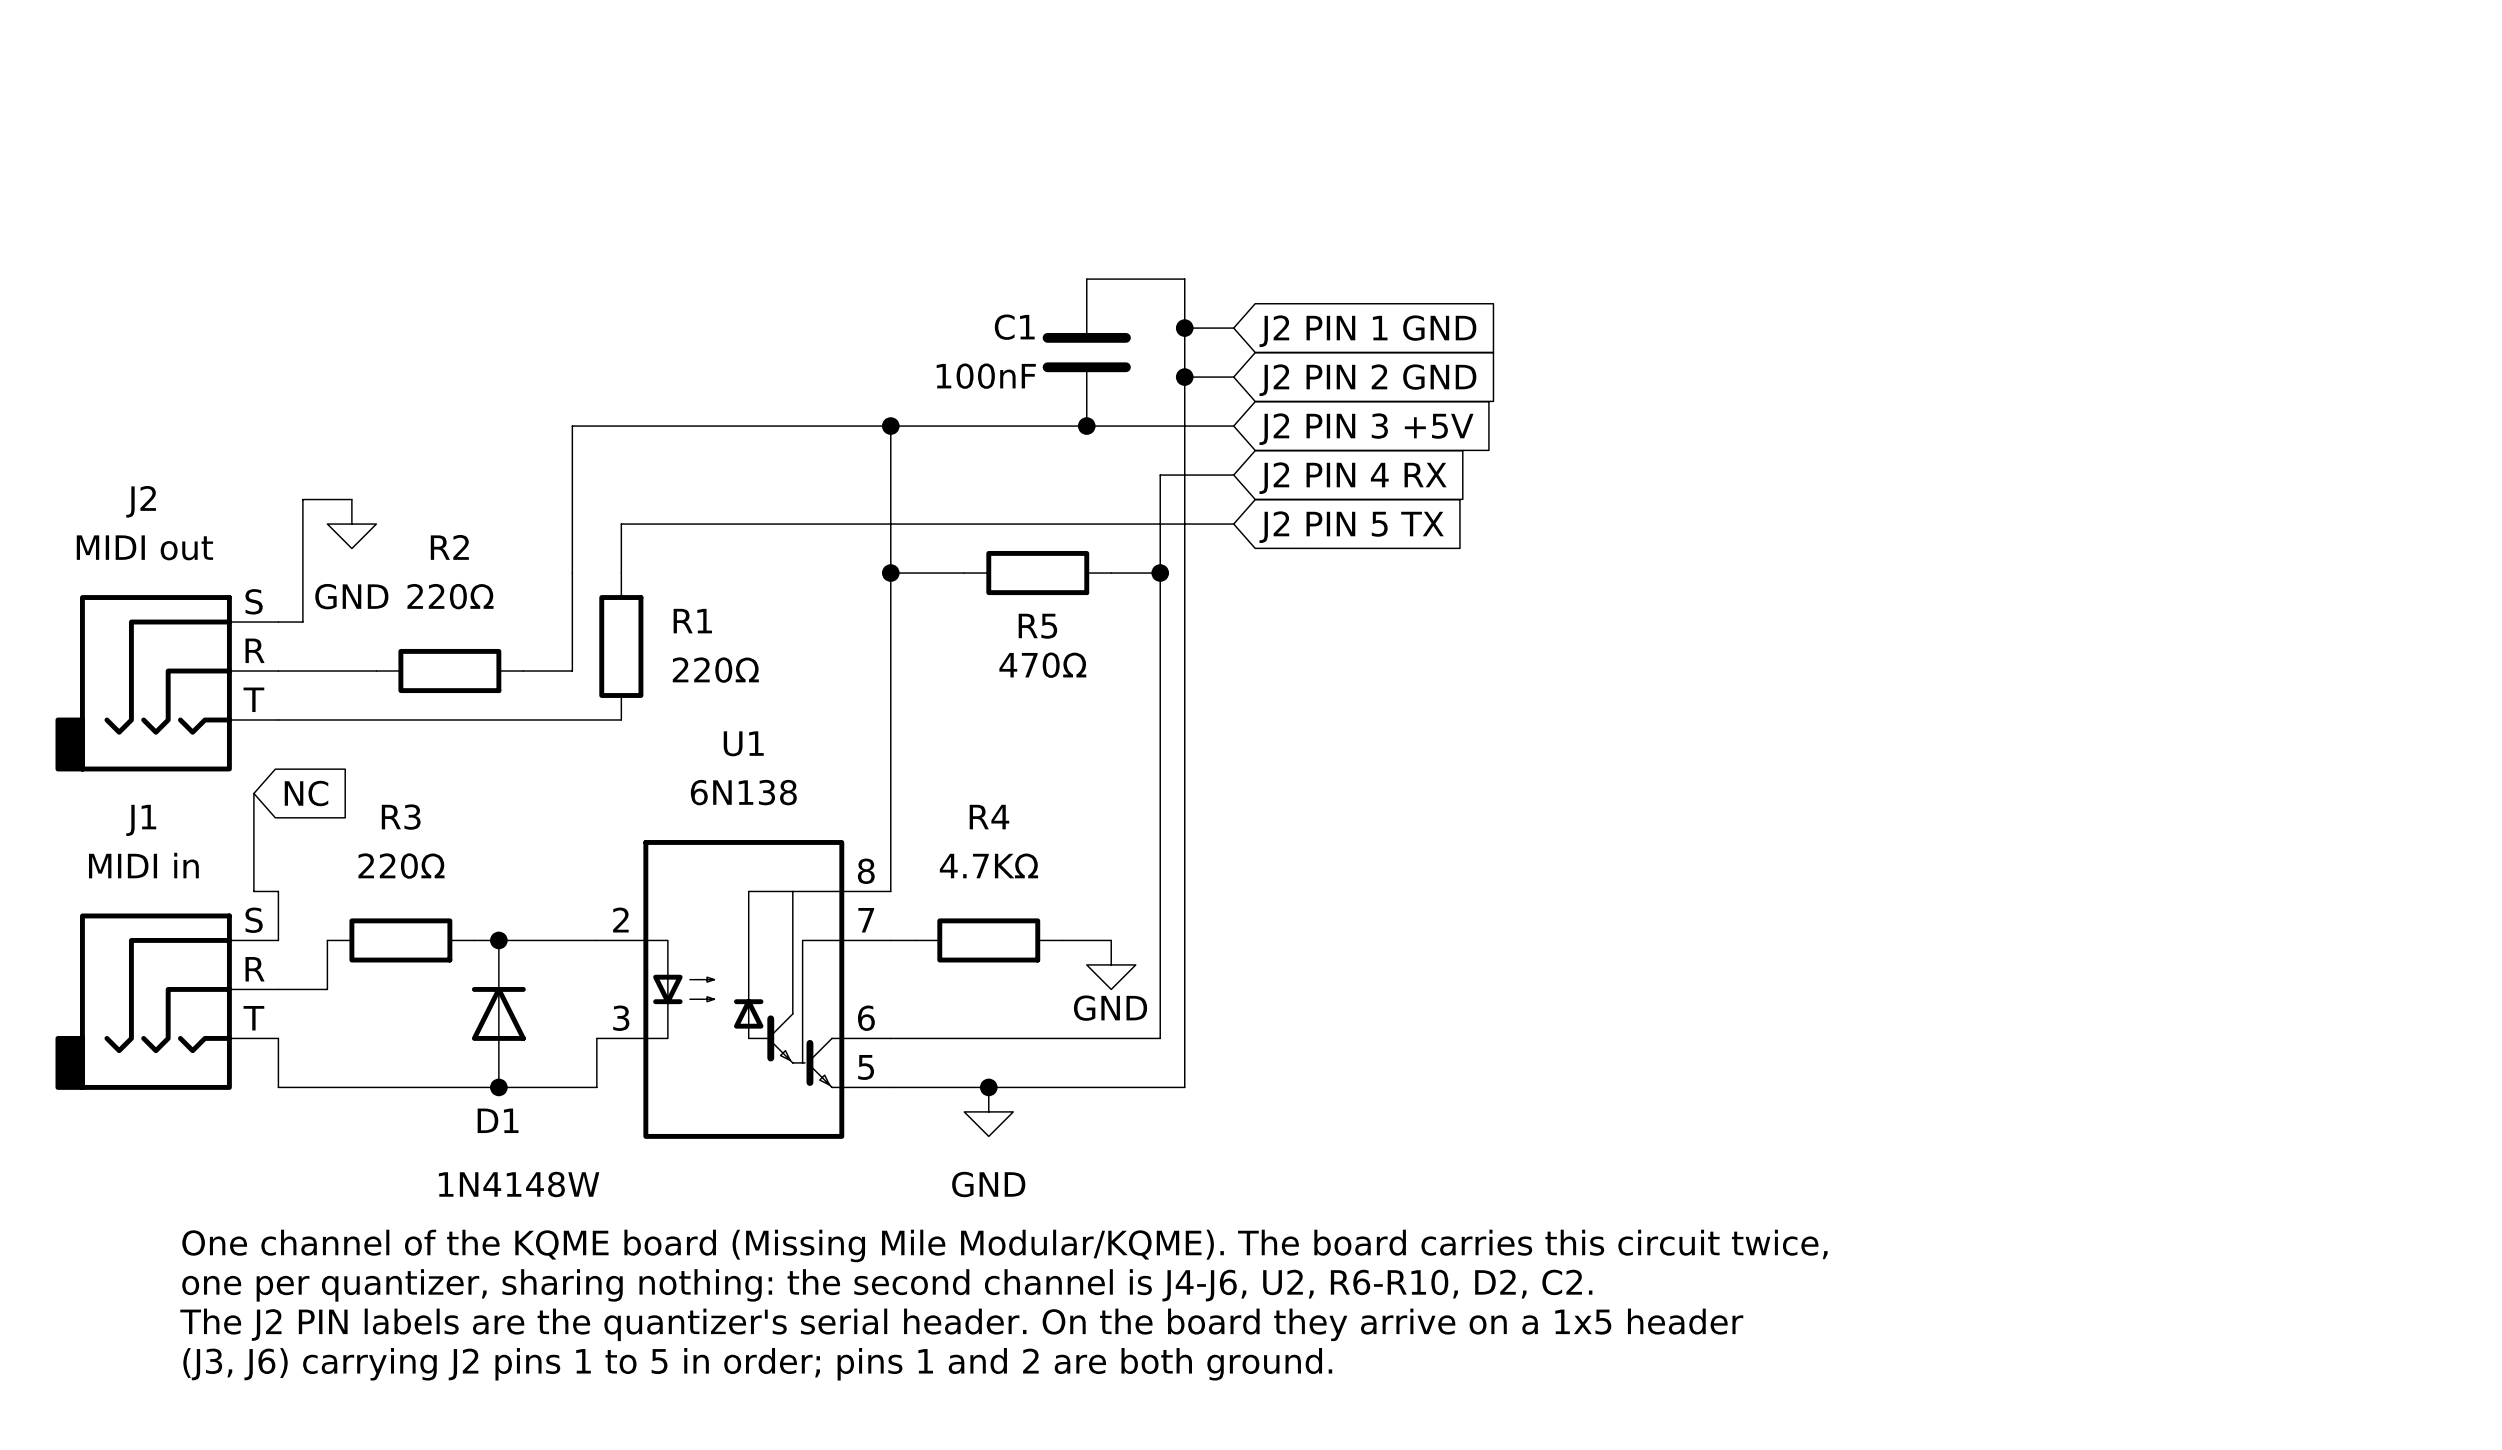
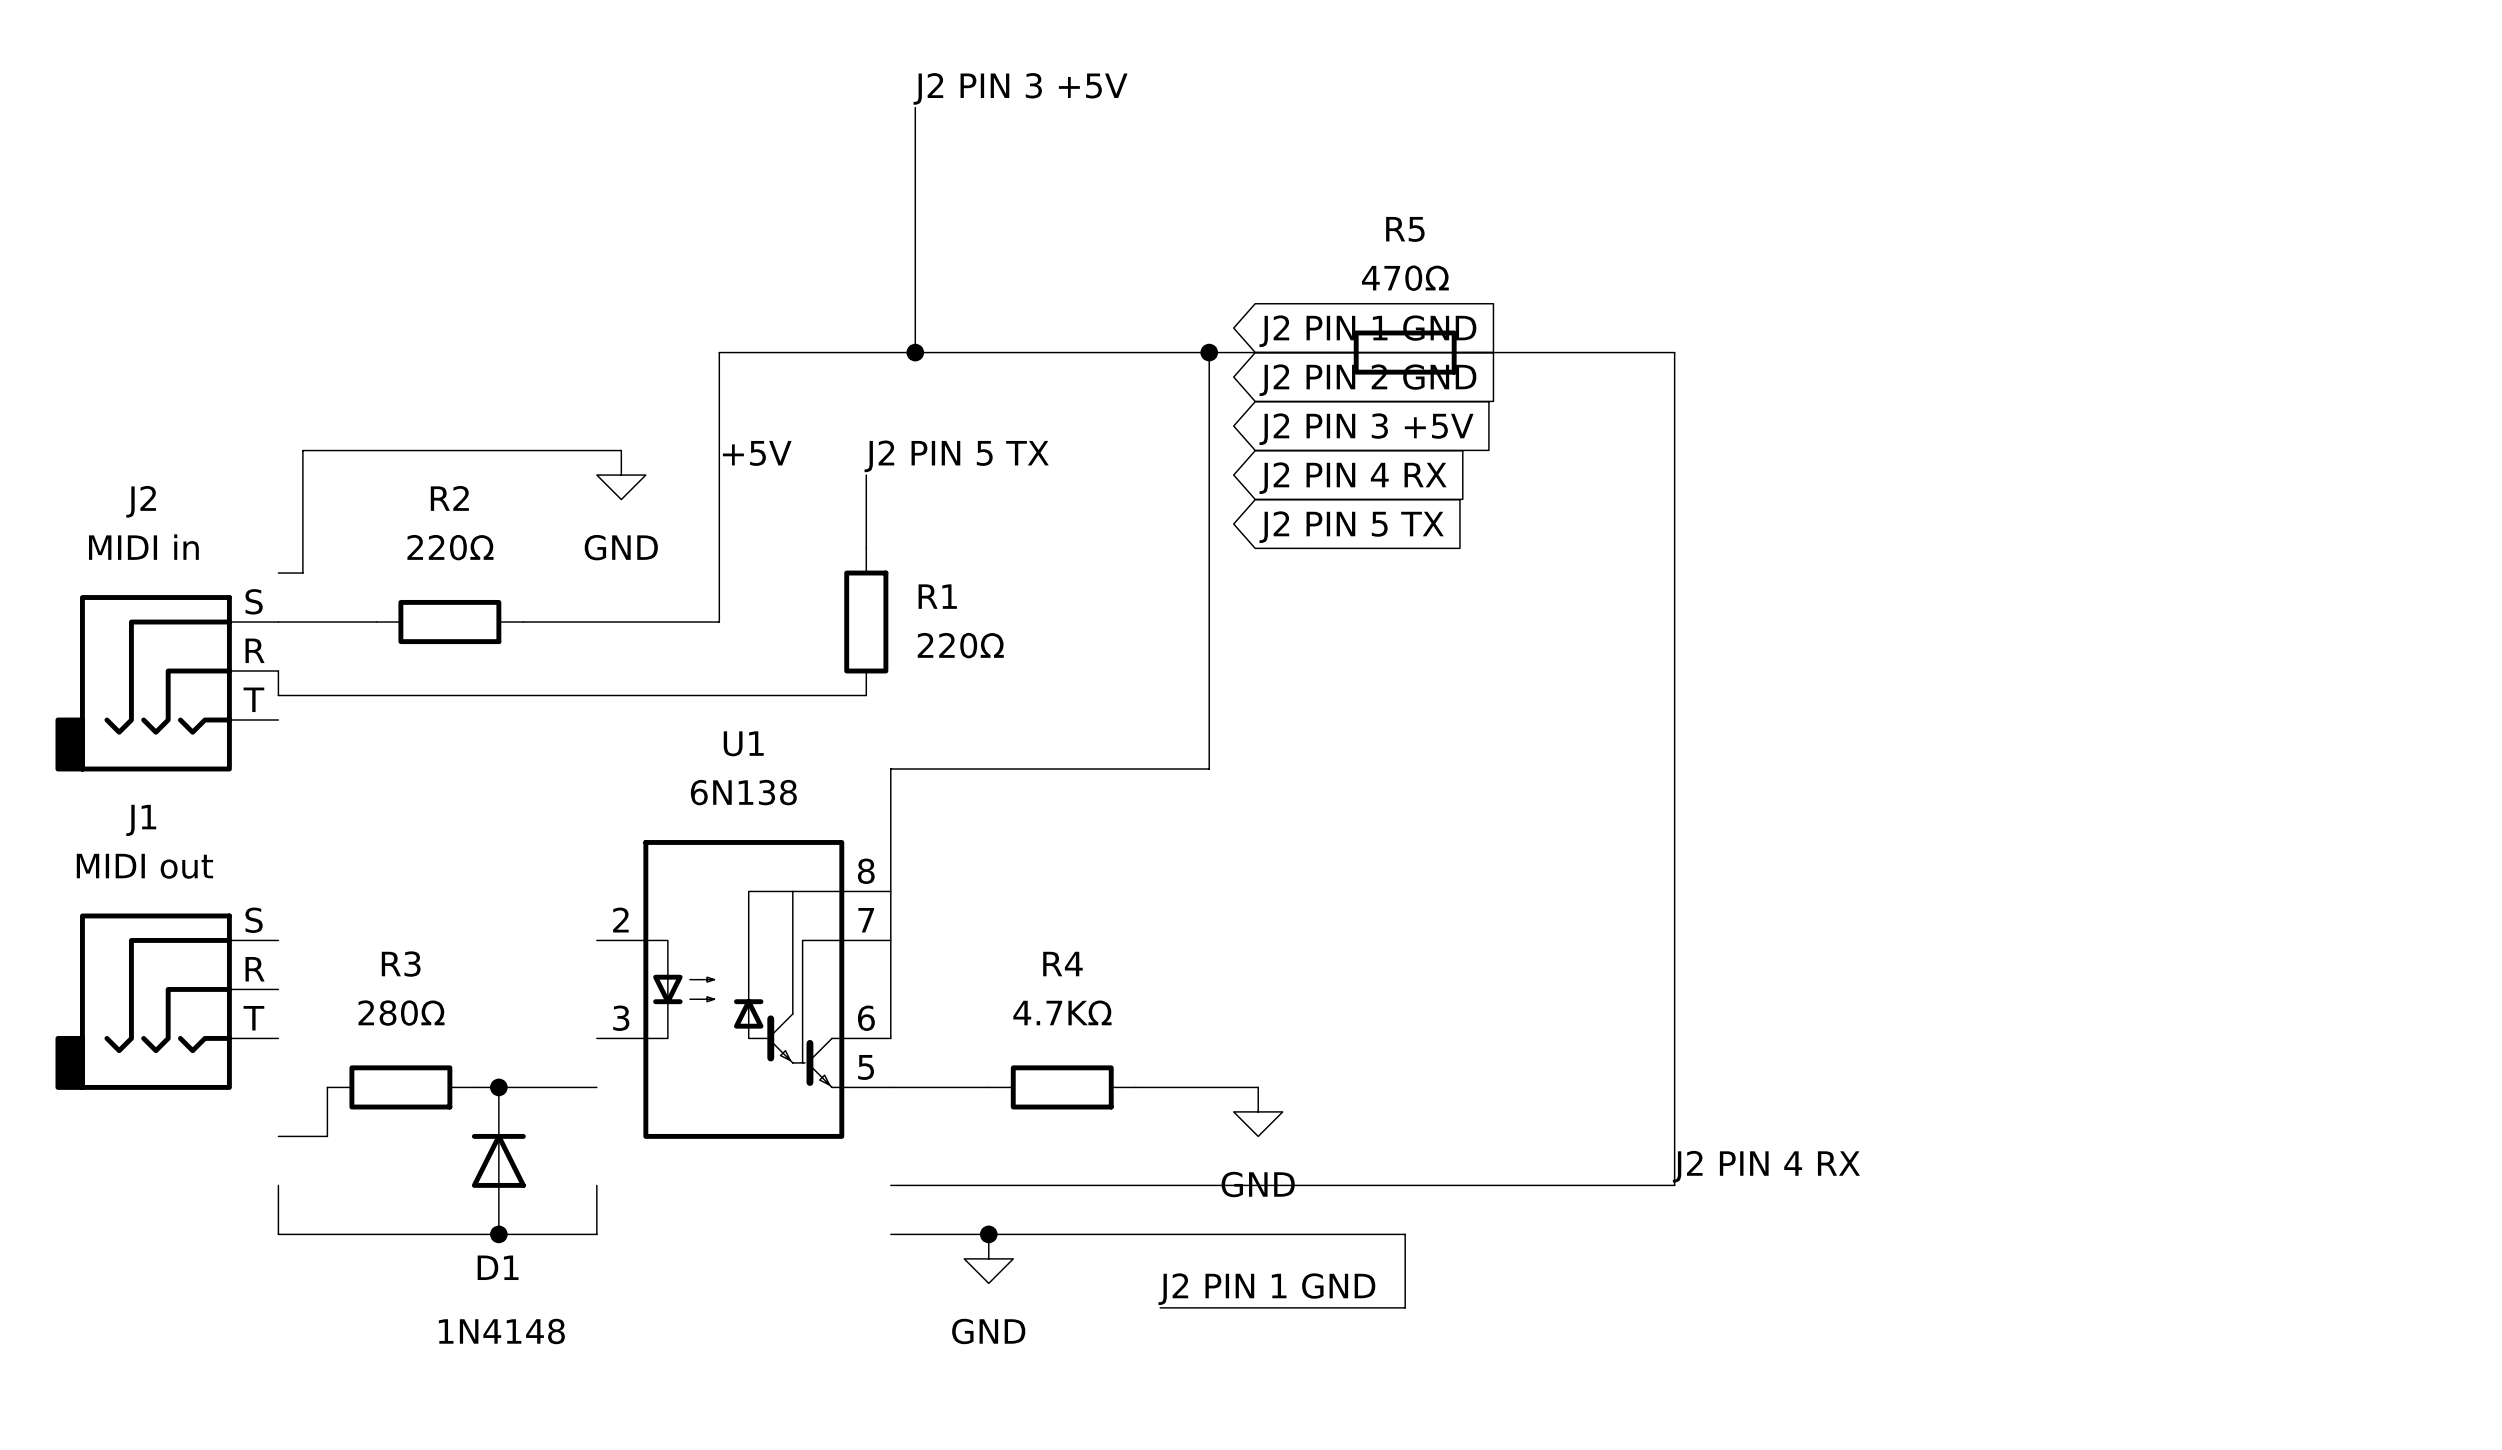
label: none -> J2 PIN 3 +5V (1020, 88)
wire: none -> (915, 107) (915, 352)
wire: (1086, 279) (1184, 279) (1184, 1087) -> (1258, 1087) (1184, 1087)
wire: (1184, 328) (1233, 328) -> none
junction: (1184, 328) -> none
C1: 100nF (1086, 352) -> none
junction: none -> (1209, 352)
wire: none -> (1331, 352) (719, 352) (719, 622) (523, 622)
wire: none -> (1478, 352) (1674, 352) (1674, 1185) (890, 1185)
wire: (1184, 377) (1233, 377) -> none
junction: (1184, 377) -> none
wire: (890, 426) (890, 768) -> (1209, 352) (1209, 768) (890, 768)
junction position: (890, 426) -> (915, 352)
junction: (1086, 426) -> none
wire: (1233, 426) (572, 426) (572, 671) (523, 671) -> none
label: none -> +5V (757, 453)
label: none -> J2 PIN 5 TX (956, 456)
wire: none -> (866, 475) (866, 548)
wire: (1233, 475) (1160, 475) (1160, 1038) (890, 1038) -> (890, 891) (890, 1038)
wire: (302, 499) (351, 499) -> (302, 499) (302, 450) (621, 450)
power symbol position: GND (351, 524) -> GND (621, 475)
wire: (1233, 524) (621, 524) (621, 573) -> none
J2 value: MIDI out (144, 547) -> MIDI in (143, 547)
wire: (302, 573) (302, 622) -> (302, 573) (278, 573)
wire: (890, 573) (964, 573) -> none
junction: (890, 573) -> none
R5 position: (1037, 573) -> (1405, 352)
wire: (1111, 573) (1160, 573) -> none
junction: (1160, 573) -> none
wire: none -> (302, 622) (376, 622)
R5 name position: R5 (1037, 626) -> R5 (1405, 229)
R1 position: (621, 646) -> (866, 622)
R5 value position: 470Ω (1042, 665) -> 470Ω (1405, 278)
wire: (278, 671) (376, 671) -> (278, 671) (278, 695) (866, 695)
R2 position: (449, 671) -> (449, 622)
wire: (278, 720) (621, 720) -> none
wire: (253, 793) (253, 891) (278, 891) (278, 940) -> none
global label: NC (306, 793) -> none
J1 value: MIDI in (143, 865) -> MIDI out (144, 866)
R3 value: 220Ω (401, 866) -> 280Ω (401, 1013)
wire: (327, 940) (327, 989) (278, 989) -> (327, 1087) (327, 1136) (278, 1136)
R3 position: (400, 940) -> (400, 1087)
wire: (474, 940) (596, 940) -> none
junction: (498, 940) -> none
wire: (890, 940) (915, 940) -> none
R4 position: (988, 940) -> (1062, 1087)
wire: (1062, 940) (1111, 940) -> none
power symbol: GND (1111, 964) -> none
D1 position: (498, 1013) -> (498, 1160)
wire: (278, 1038) (278, 1087) (474, 1087) -> none
wire: (596, 1038) (596, 1087) -> none
wire: (988, 1087) (1135, 1087) -> none
junction: (988, 1087) -> none
power symbol: GND (988, 1111) -> none
power symbol: none -> GND (1258, 1111)
label: none -> J2 PIN 4 RX (1766, 1166)
D1 value: 1N4148W (519, 1184) -> 1N4148 (501, 1331)
wire: none -> (278, 1185) (278, 1234) (596, 1234) (596, 1185)
junction: none -> (498, 1234)
wire: none -> (890, 1234) (1405, 1234) (1405, 1307) (1160, 1307)
junction: none -> (988, 1234)
text: One channel of the KQME board (Missing Mile Modular/KQME). The board carries this circuit twice, (1004, 1245) -> none
power symbol: none -> GND (988, 1258)
text: one per quantizer, sharing nothing: the second channel is J4-J6, U2, R6-R10, D2, C2. (887, 1285) -> none
label: none -> J2 PIN 1 GND (1266, 1289)
text: The J2 PIN labels are the quantizer's serial header. On the board they arrive on a 1x5 header (961, 1324) -> none
text: (J3, J6) carrying J2 pins 1 to 5 in order; pins 1 and 2 are both ground. (757, 1364) -> none

